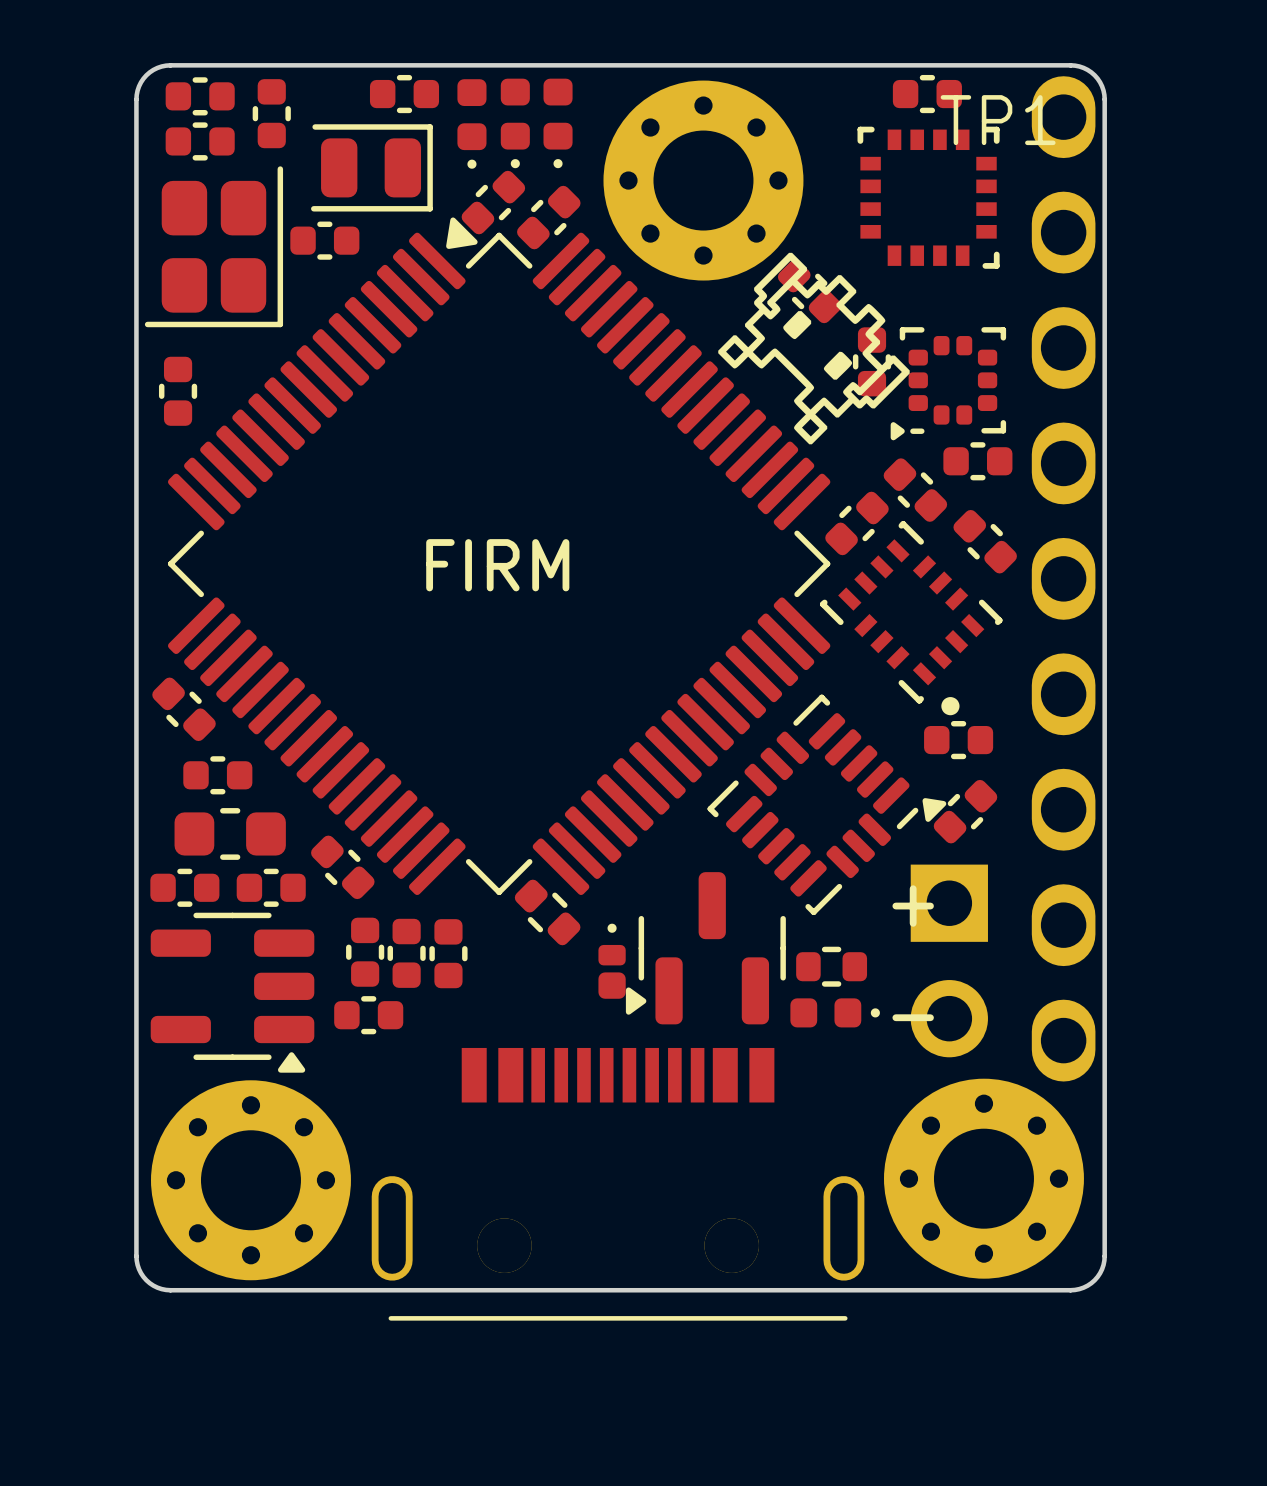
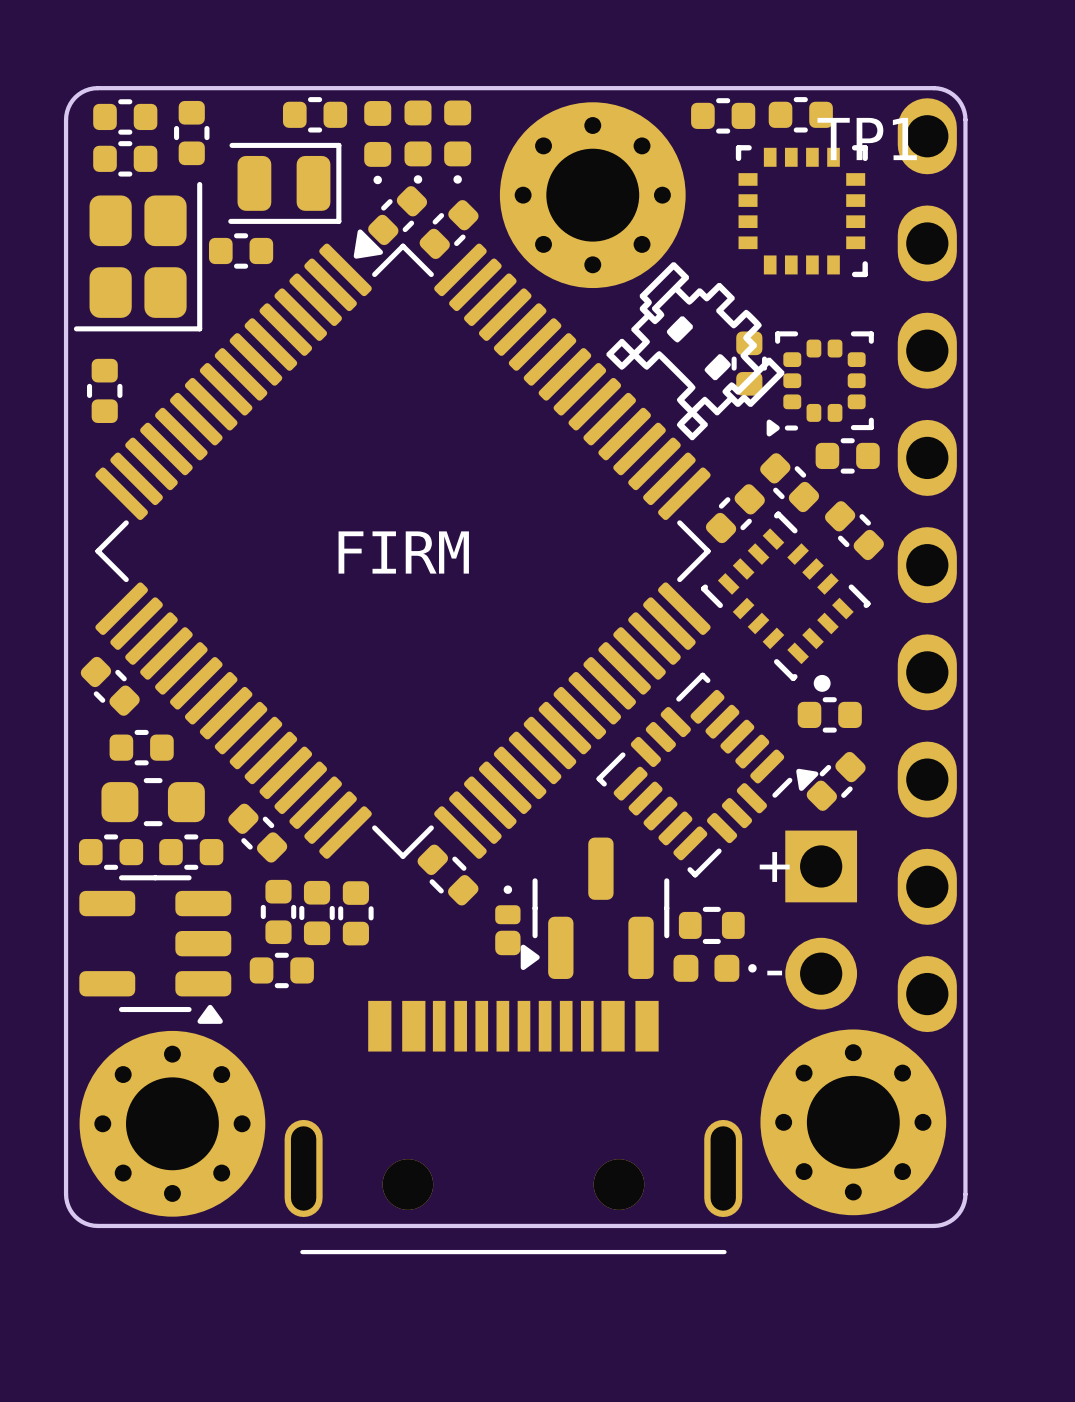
part: none -> (723, 115)
part: (809, 291) -> none

